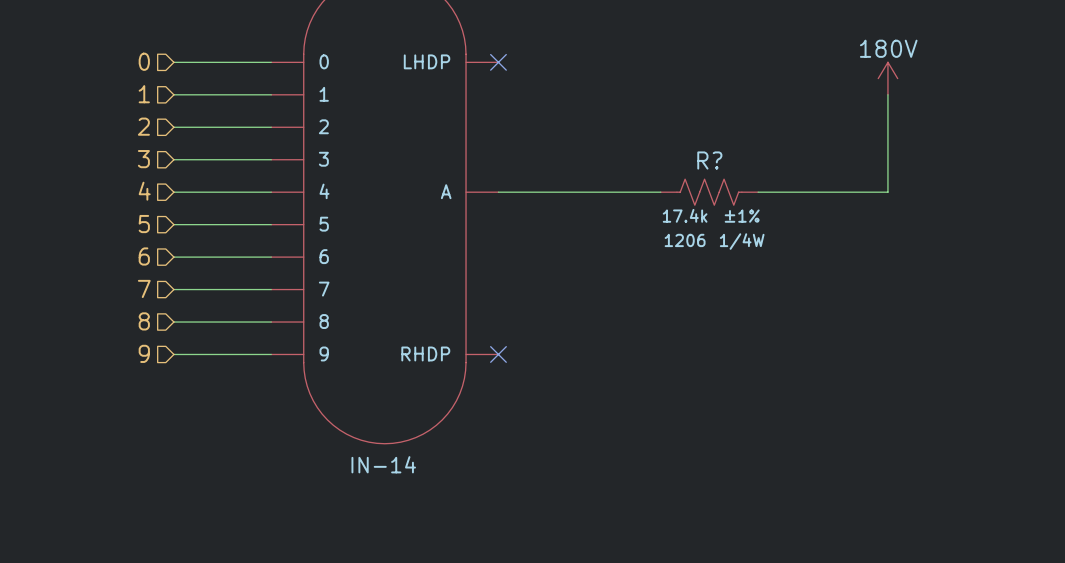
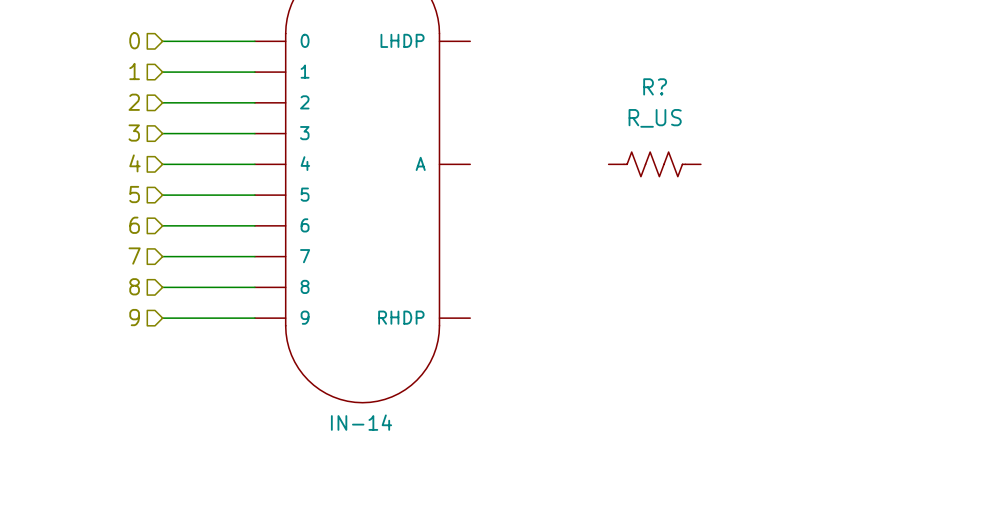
no-connect mark: (498, 62) -> none
power symbol: 180V (887, 78) -> none
wire: (887, 94) (887, 192) (758, 192) -> none
wire: (498, 192) (660, 192) -> none
R?: none -> R_US (654, 164)
R?: (709, 192) -> none
no-connect mark: (498, 354) -> none

